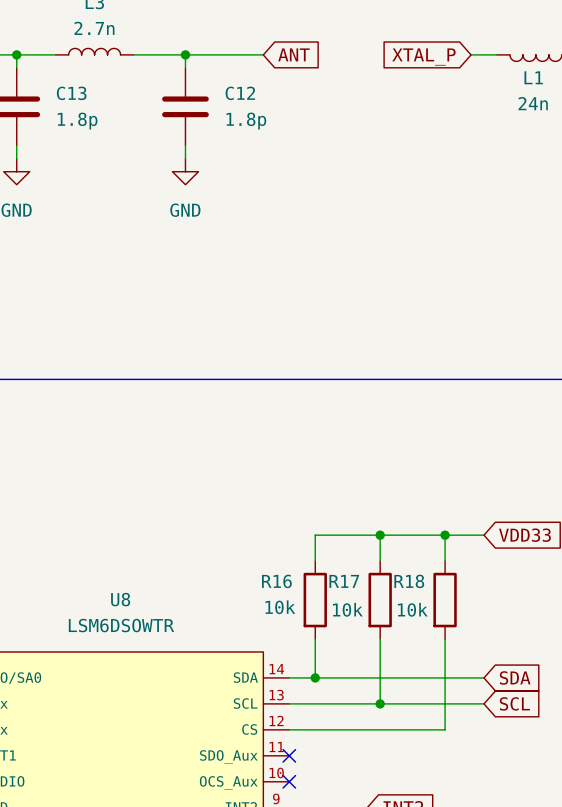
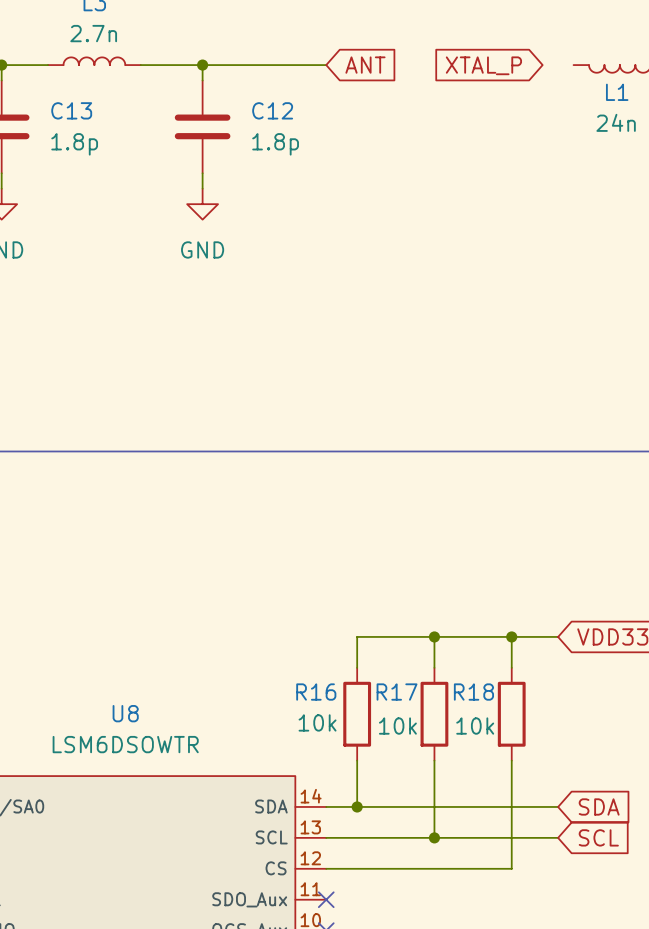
global label position: ANT (293, 54) -> ANT (365, 65)
wire: (471, 54) (496, 54) -> (295, 65) (326, 65)

